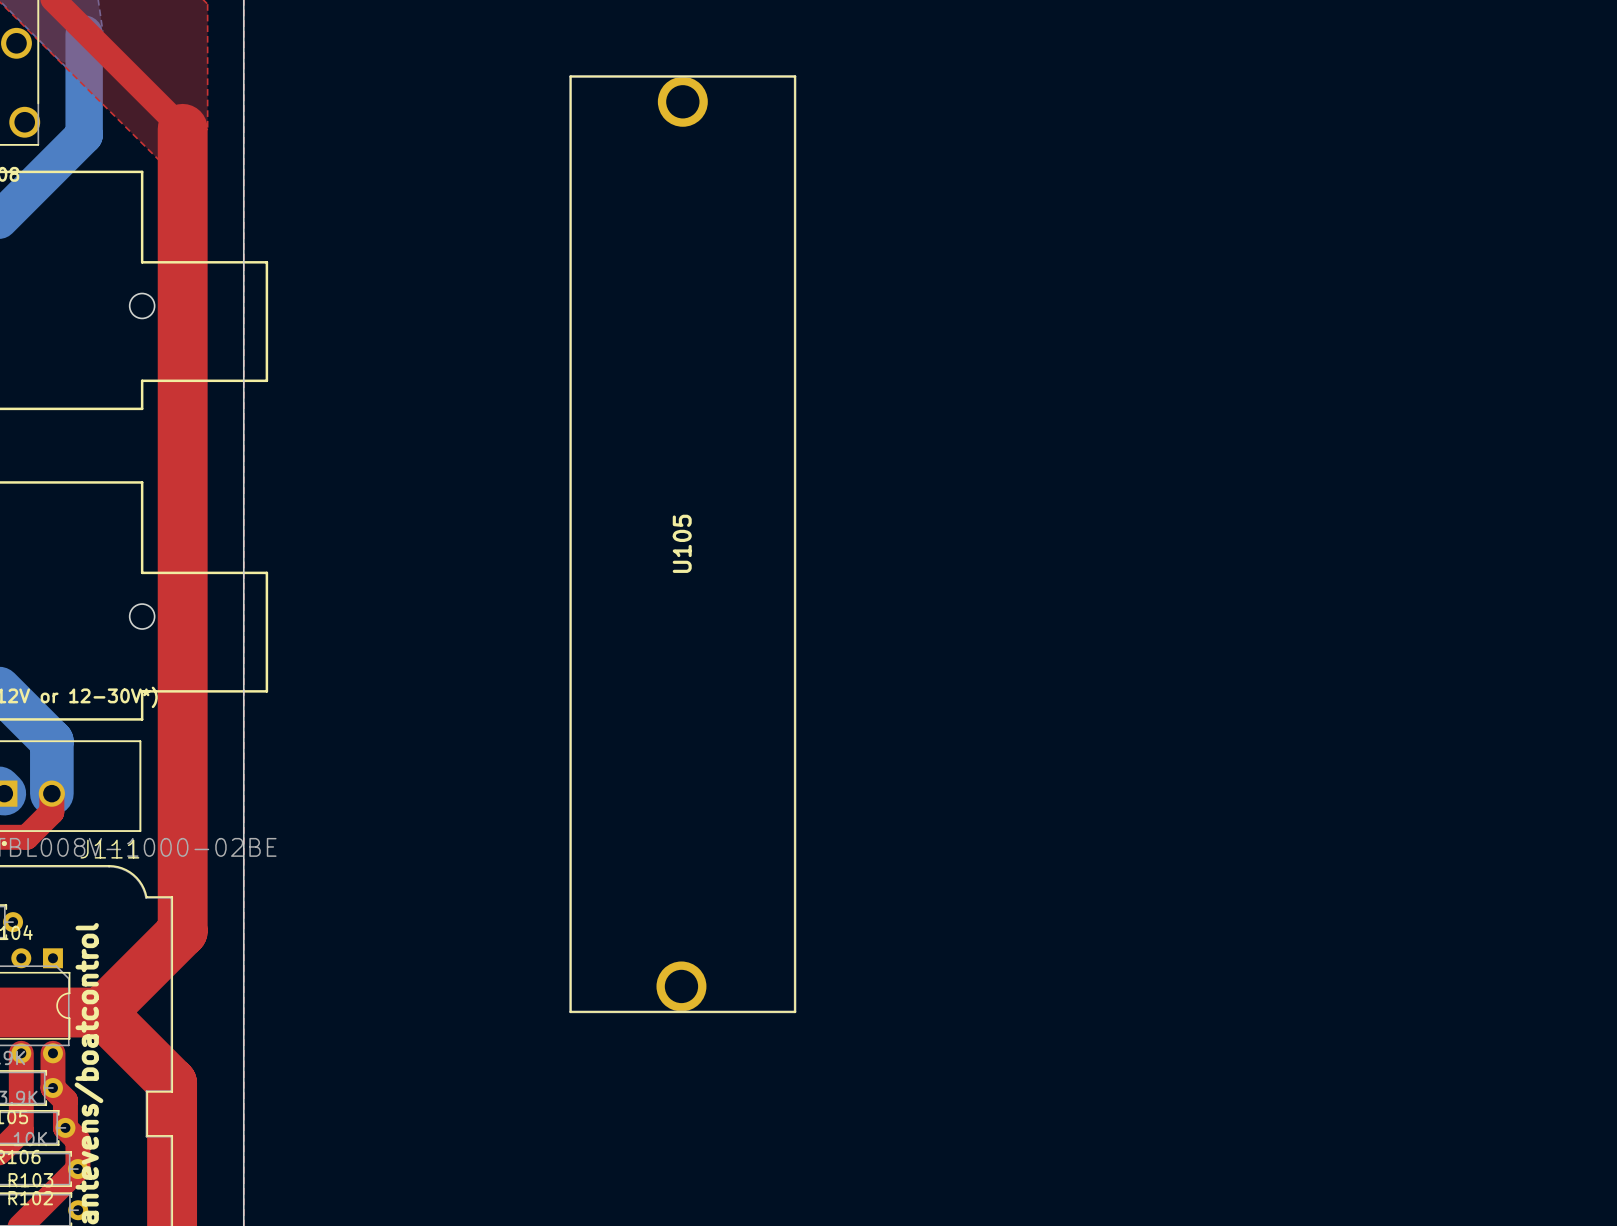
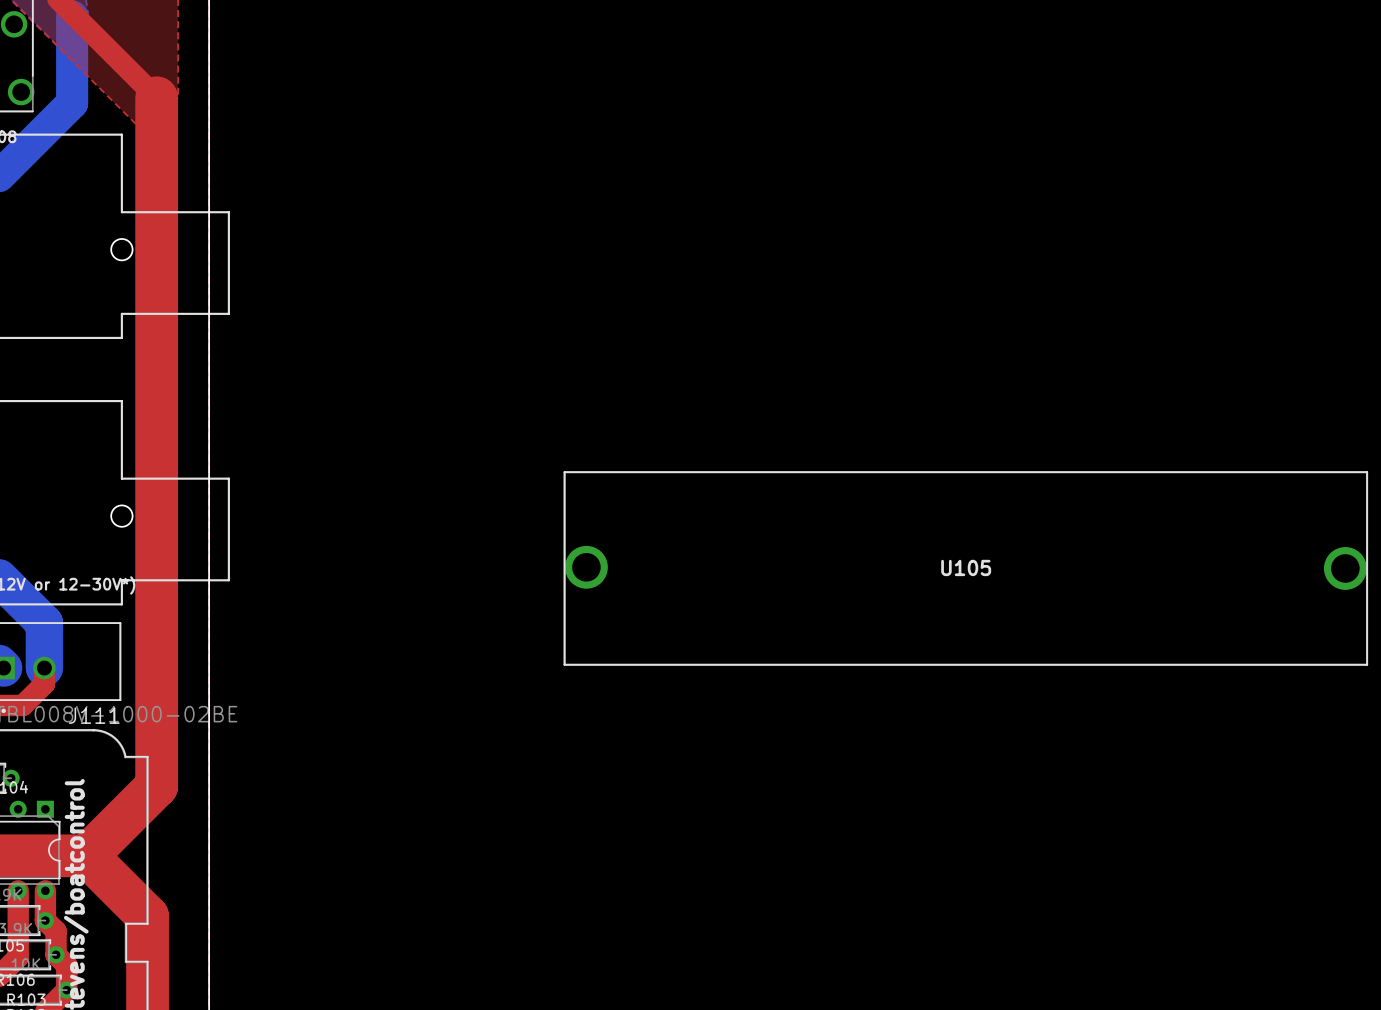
U105 rotation: 0° (682, 544) -> 90° clockwise (965, 568)

